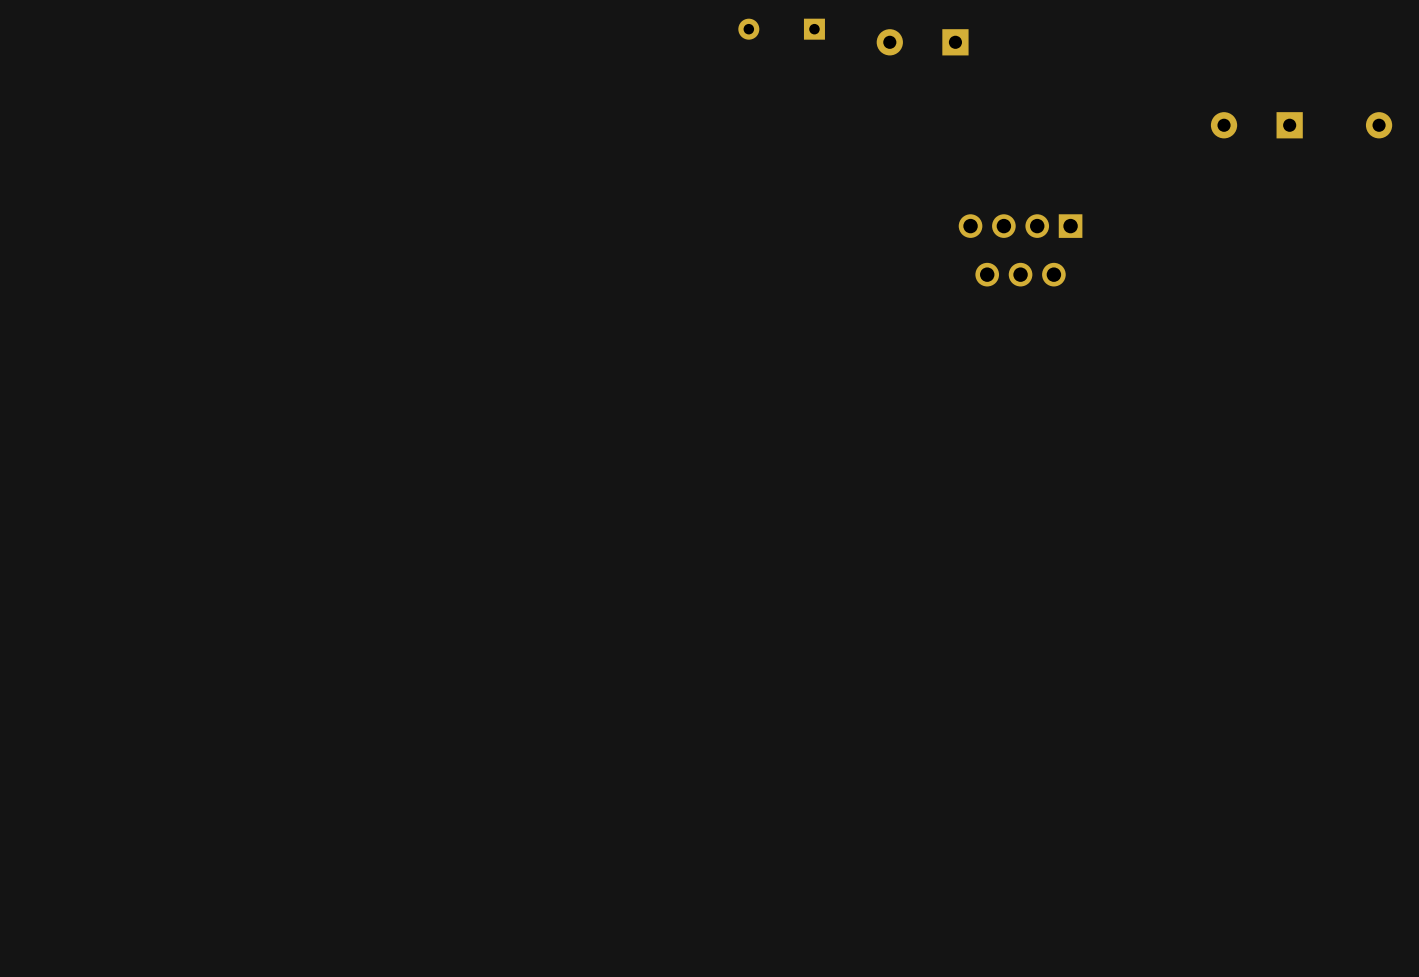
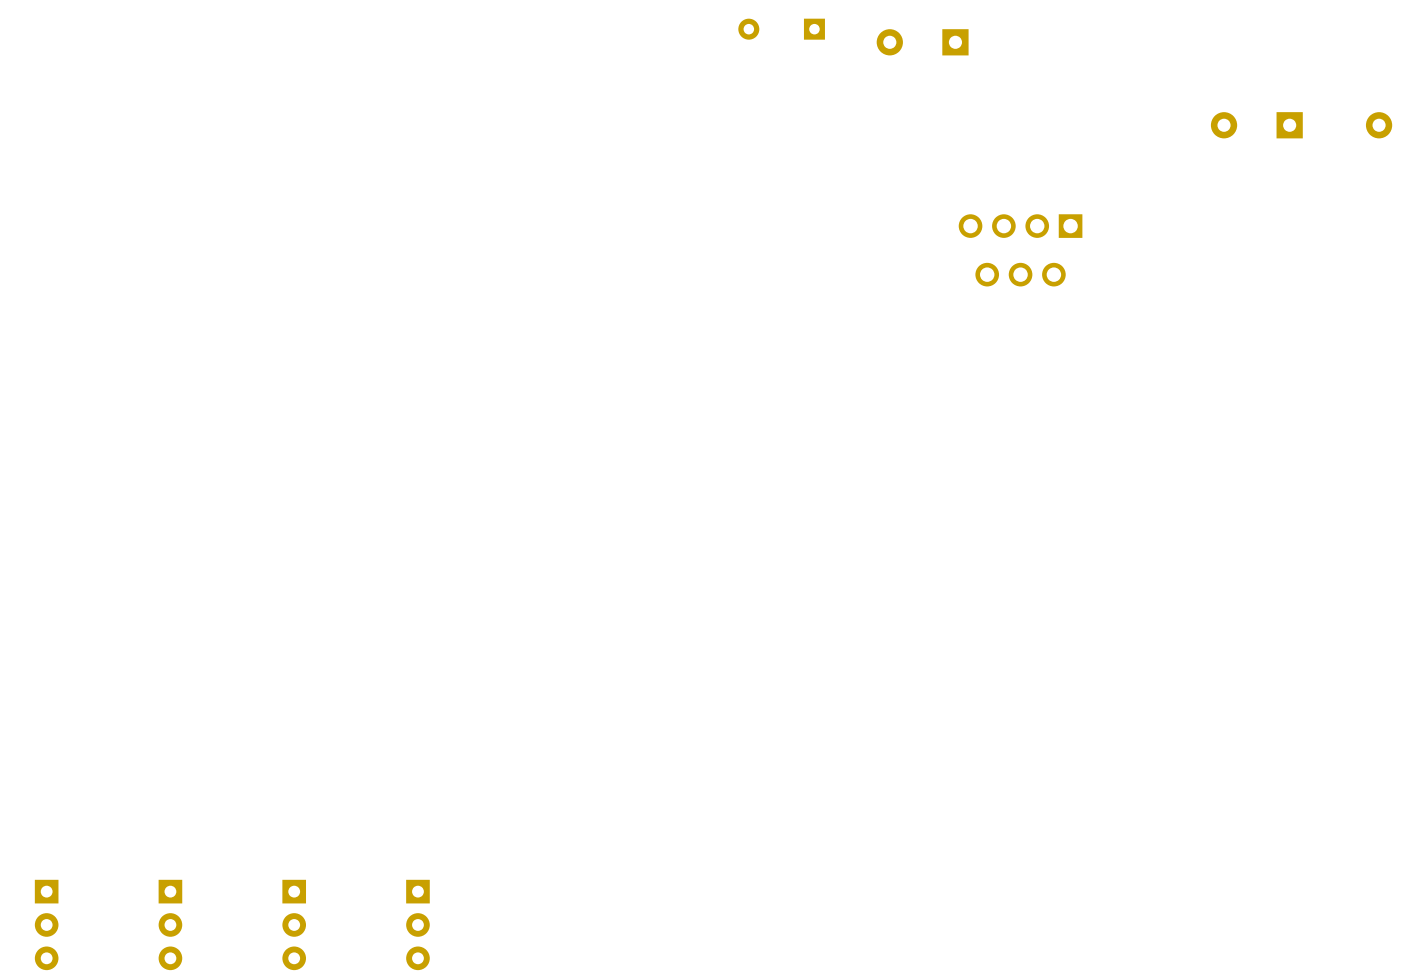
part: none -> (46, 924)
part: none -> (170, 924)
part: none -> (294, 924)
part: none -> (417, 924)

